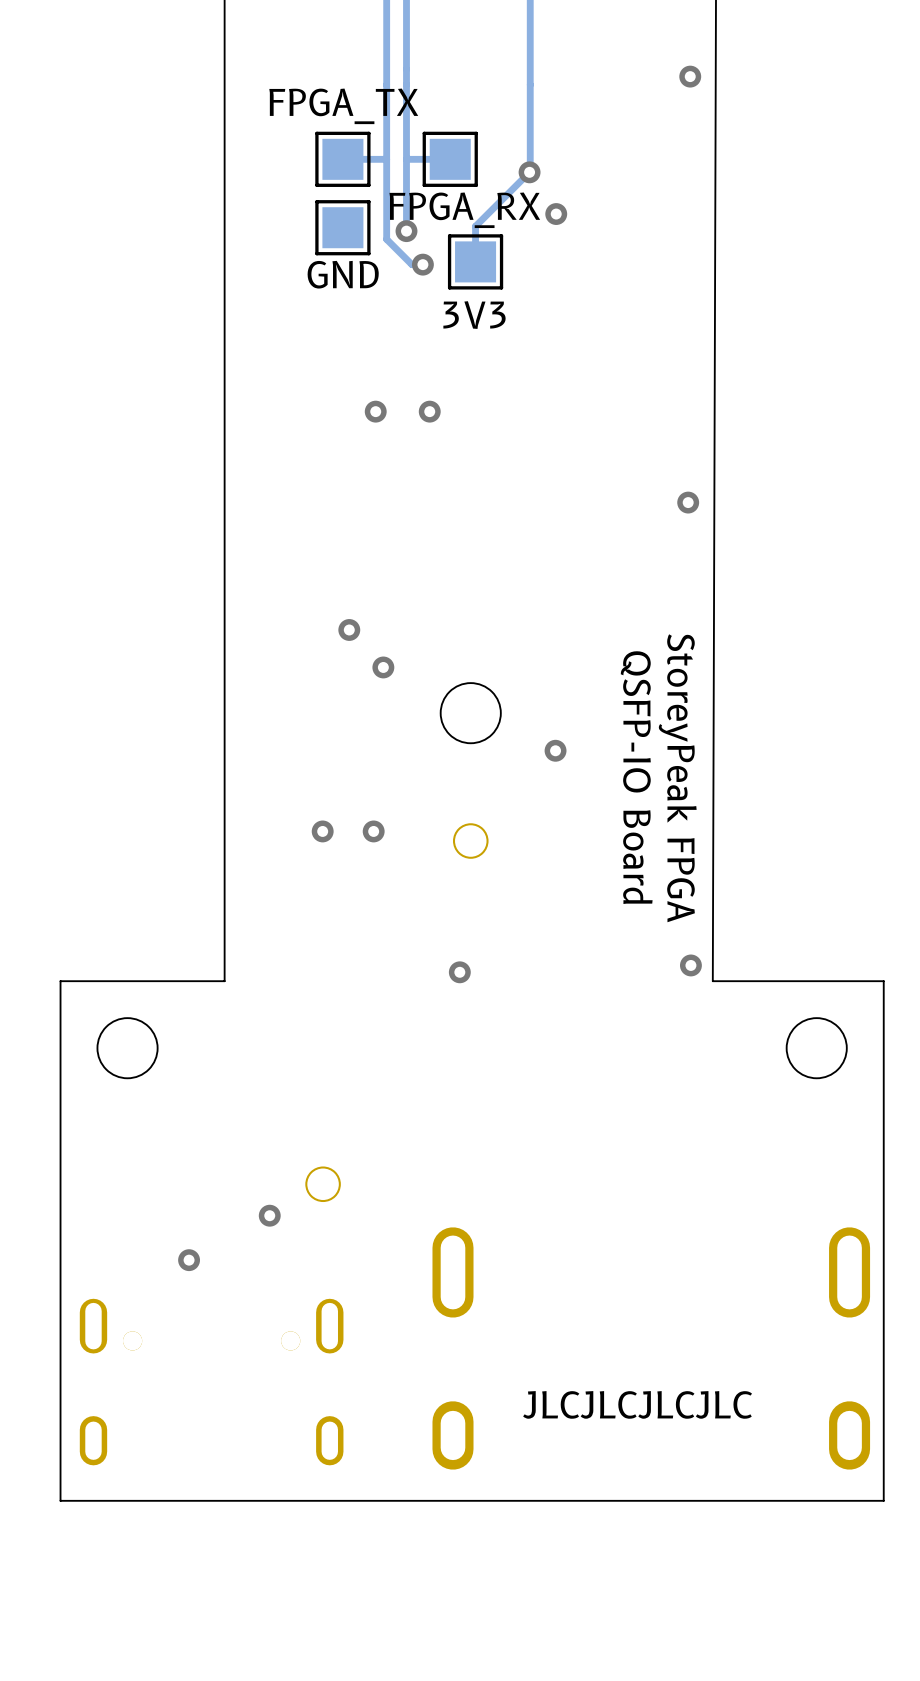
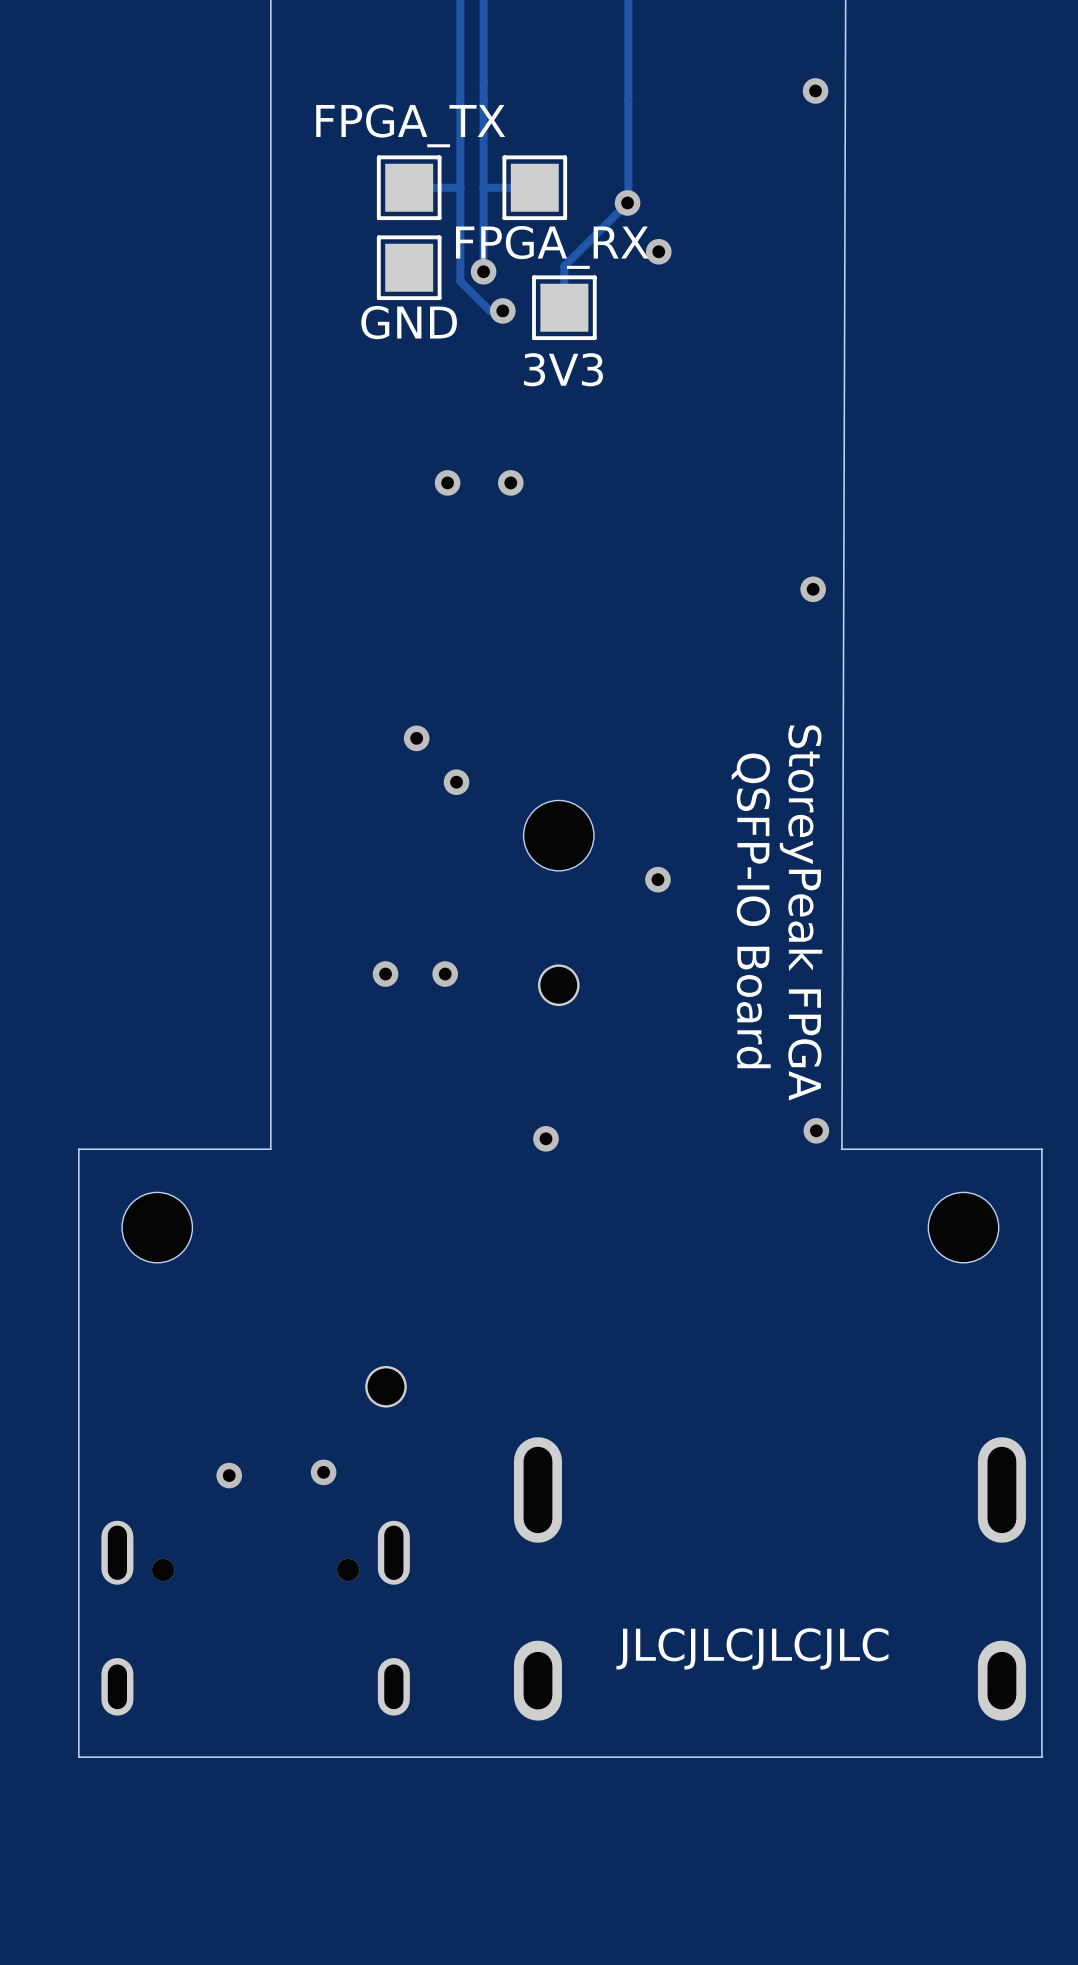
via position: (269, 1215) -> (323, 1472)

